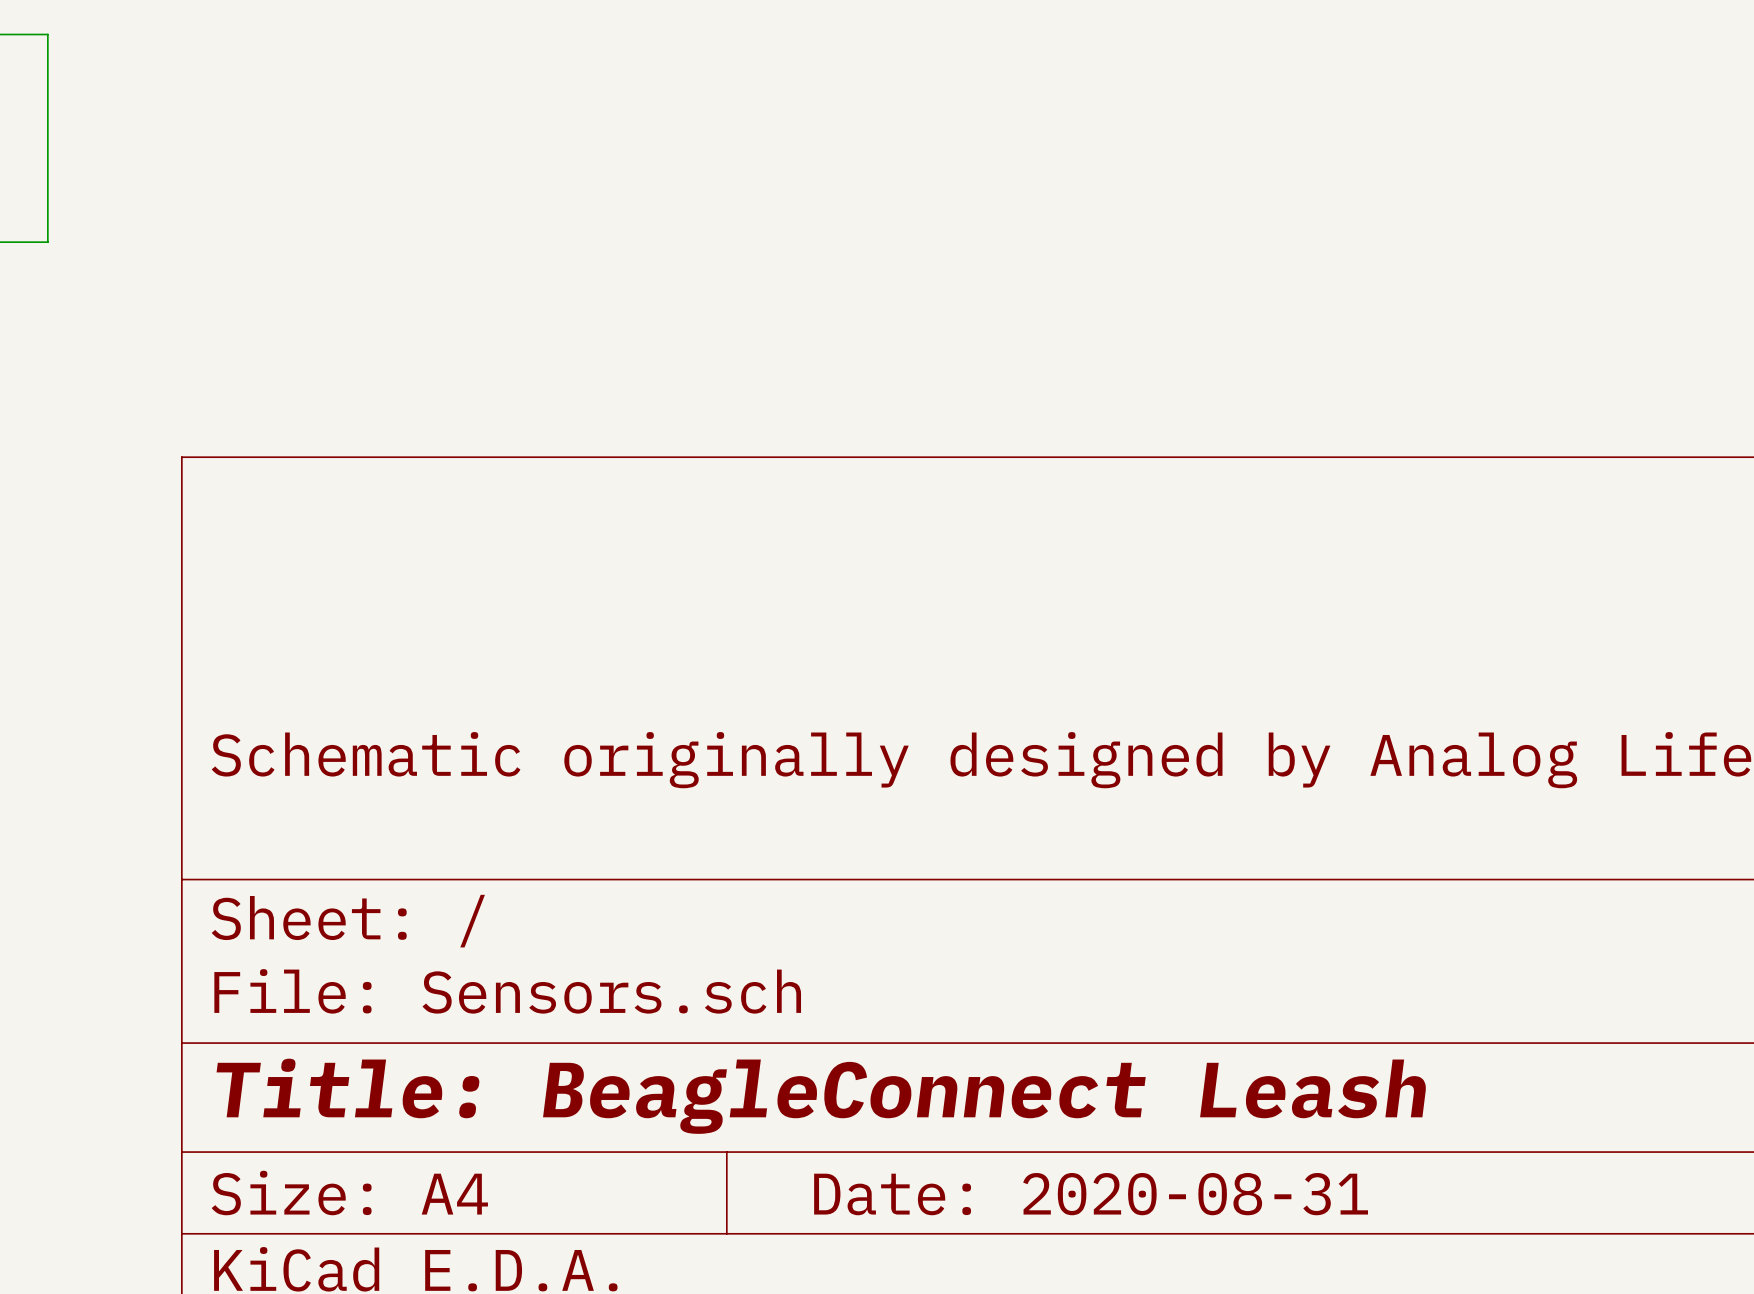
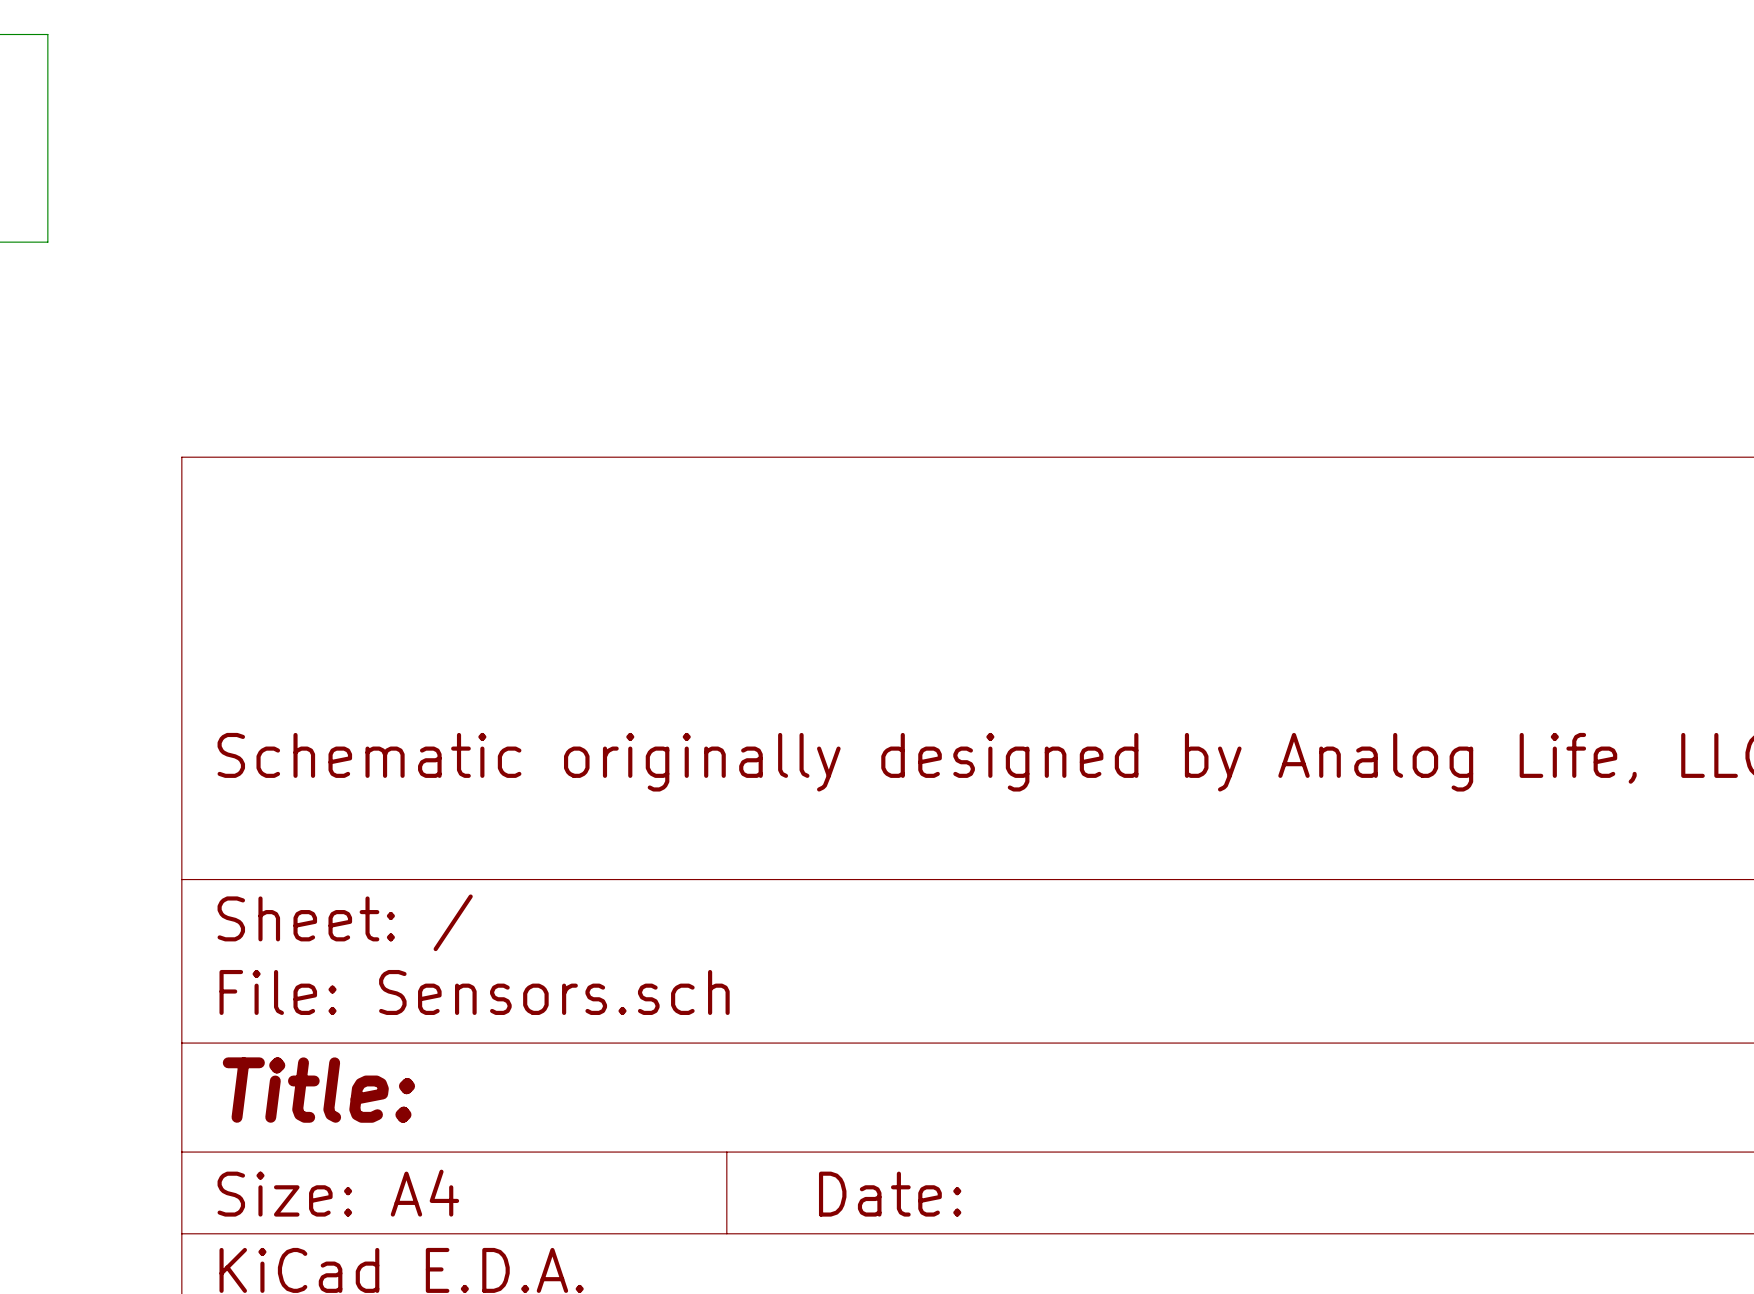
title block: Title: BeagleConnect Leash (821, 1096) -> Title: (318, 1090)
title block: Date: 2020-08-31 (1091, 1194) -> Date: (890, 1194)

